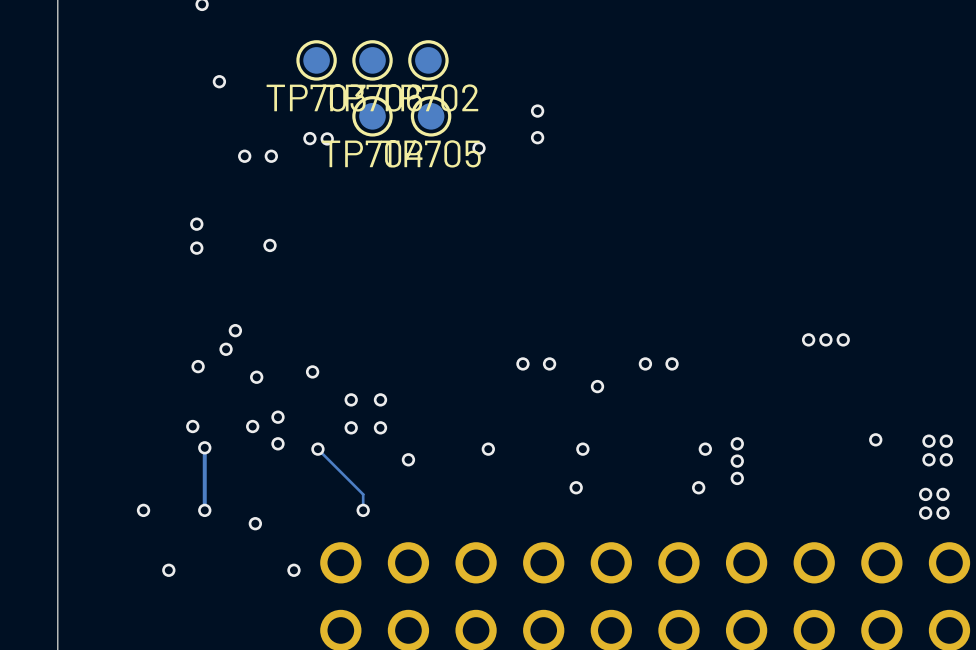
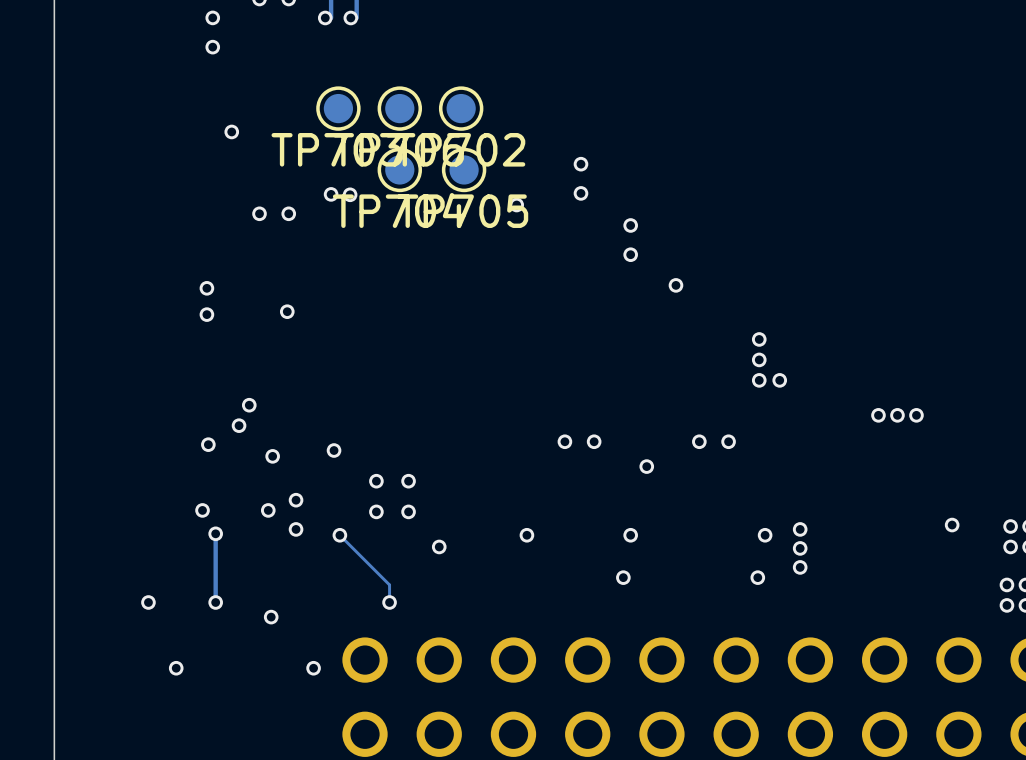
via: none -> (630, 225)
via: none -> (630, 254)
via: none -> (675, 285)
via: none -> (759, 339)
via: none -> (759, 359)
via: none -> (759, 380)
via: none -> (779, 380)

